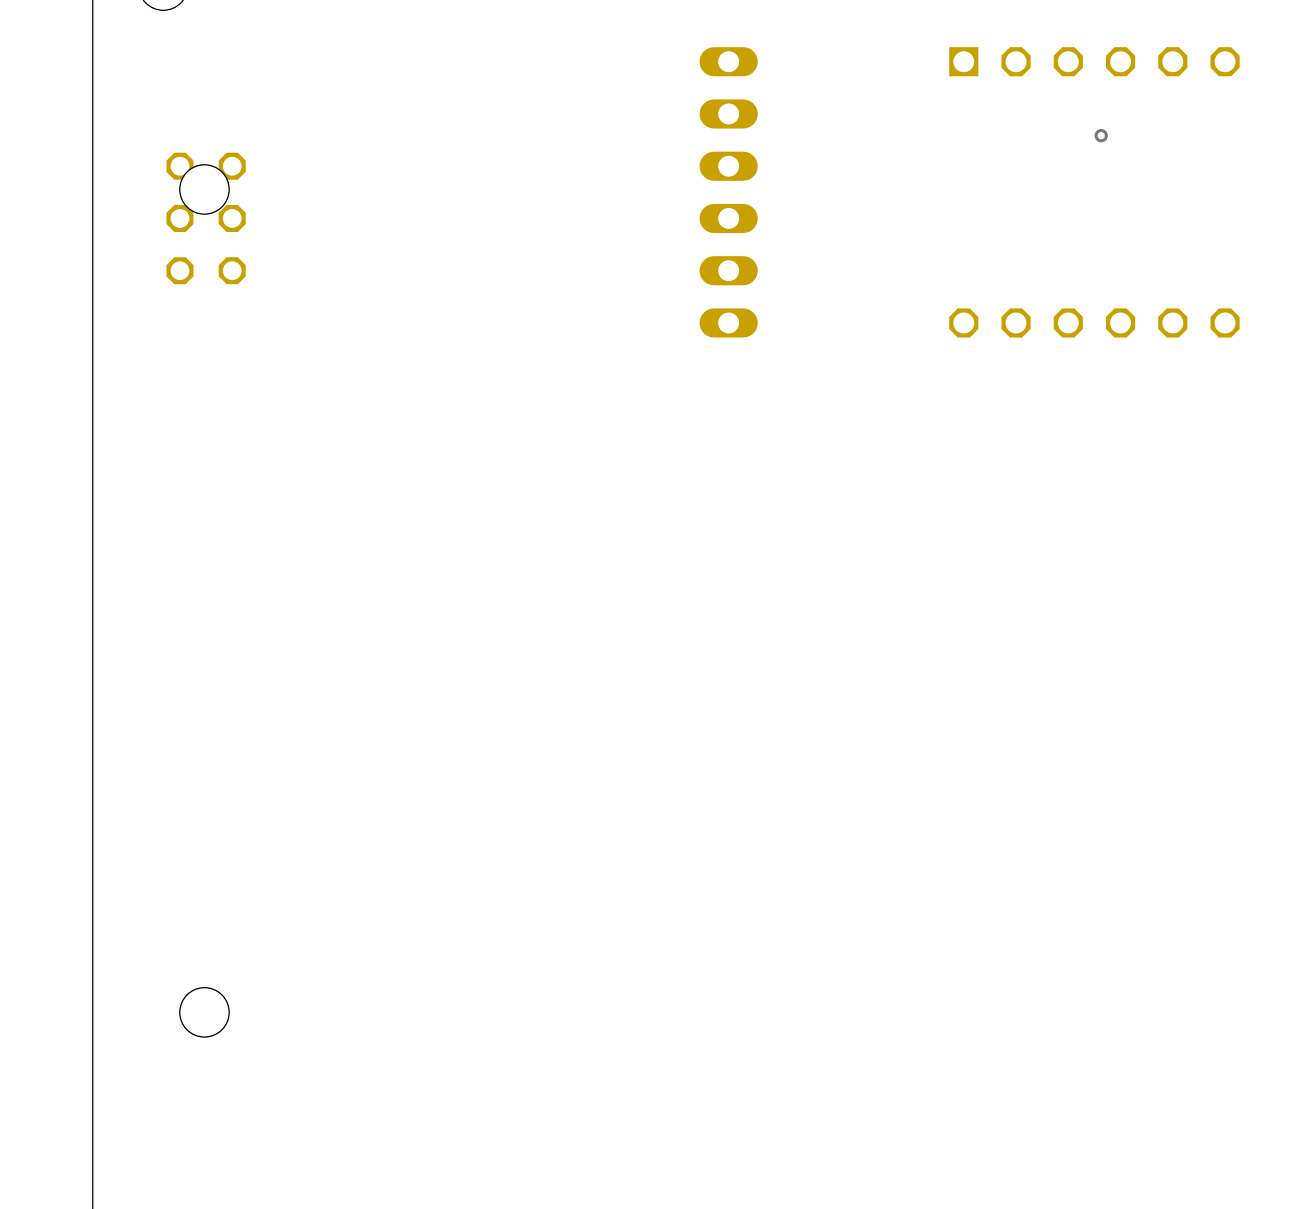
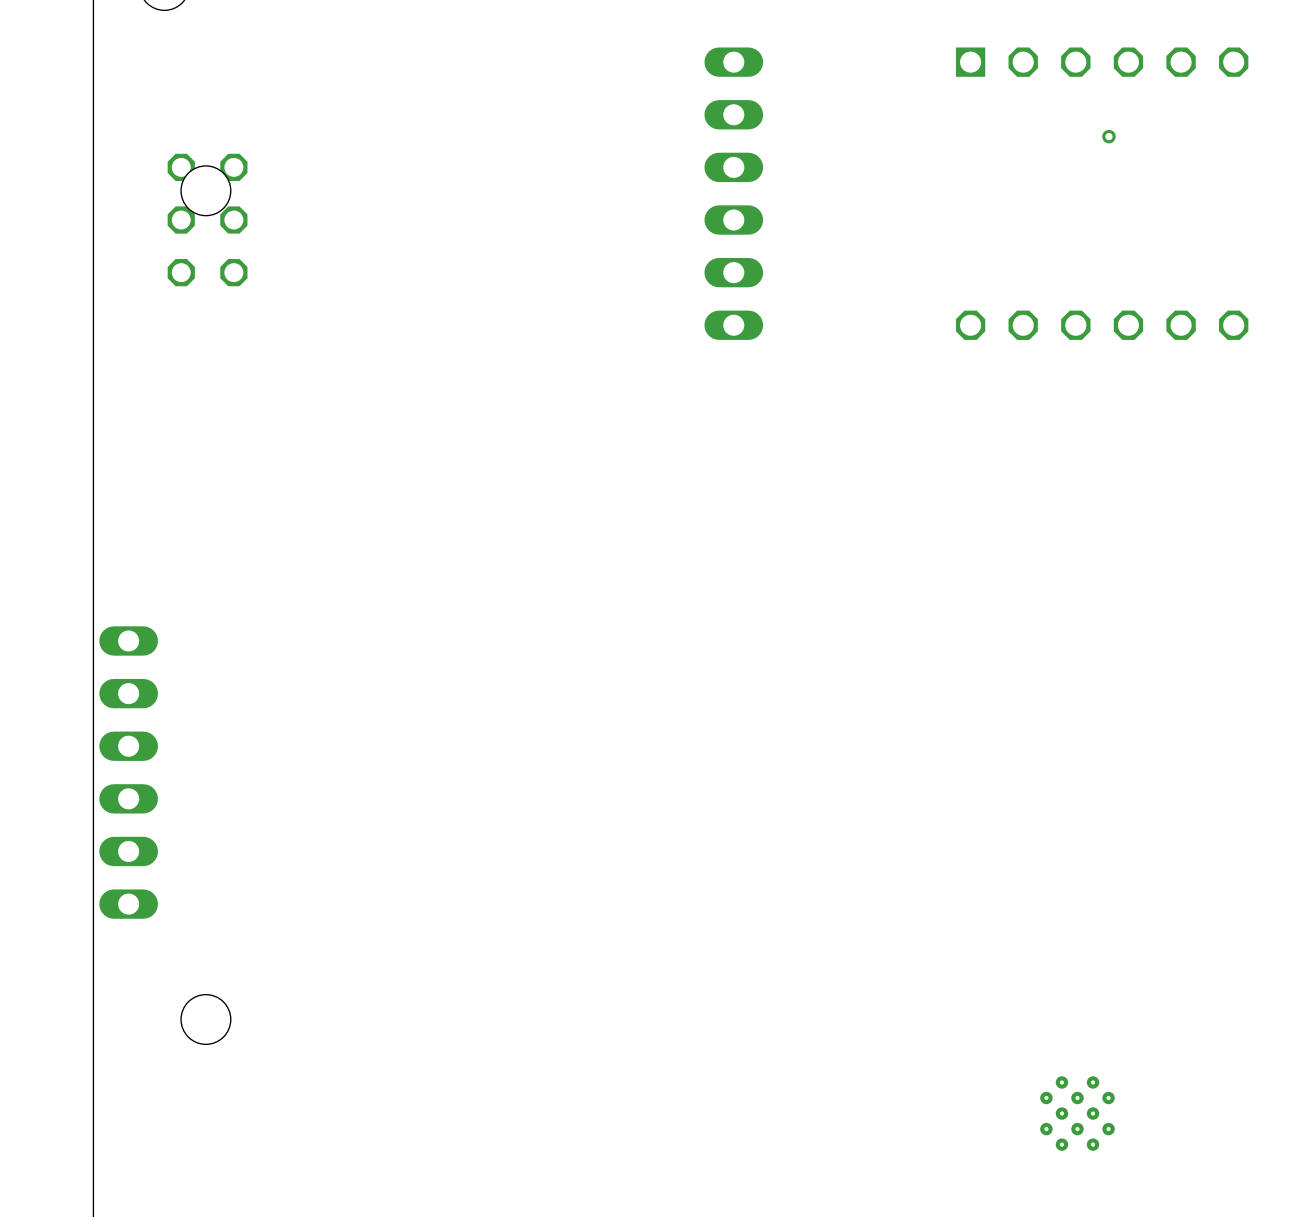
part: none -> (128, 772)
part: none -> (1077, 1113)

